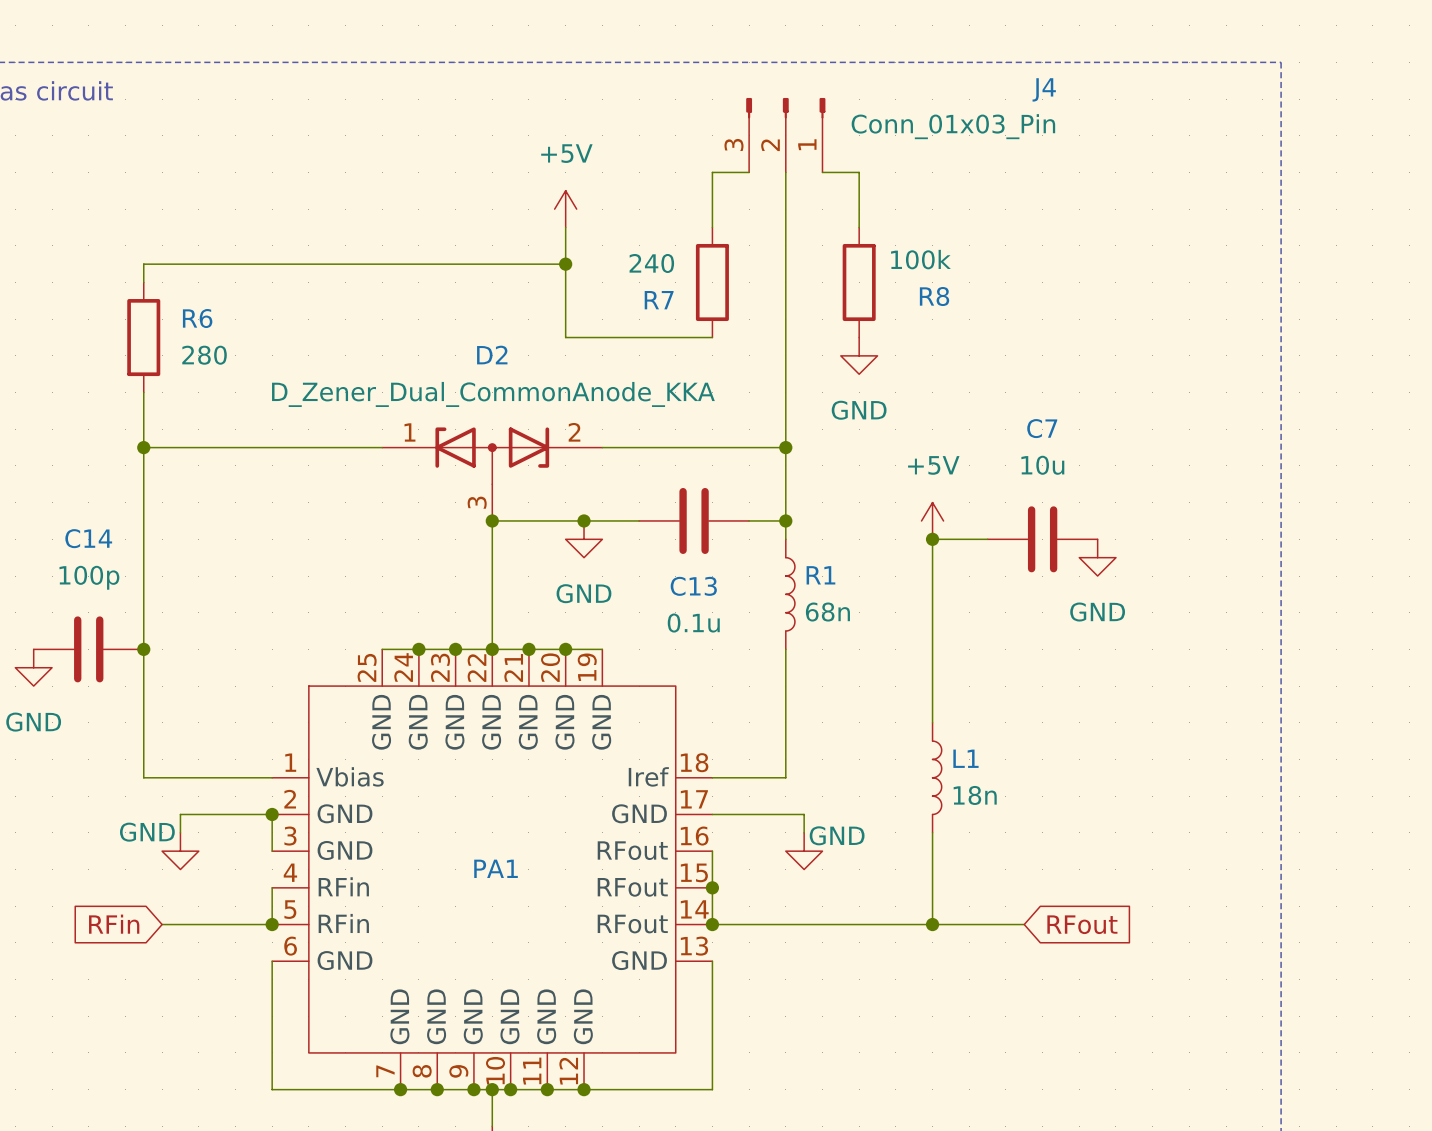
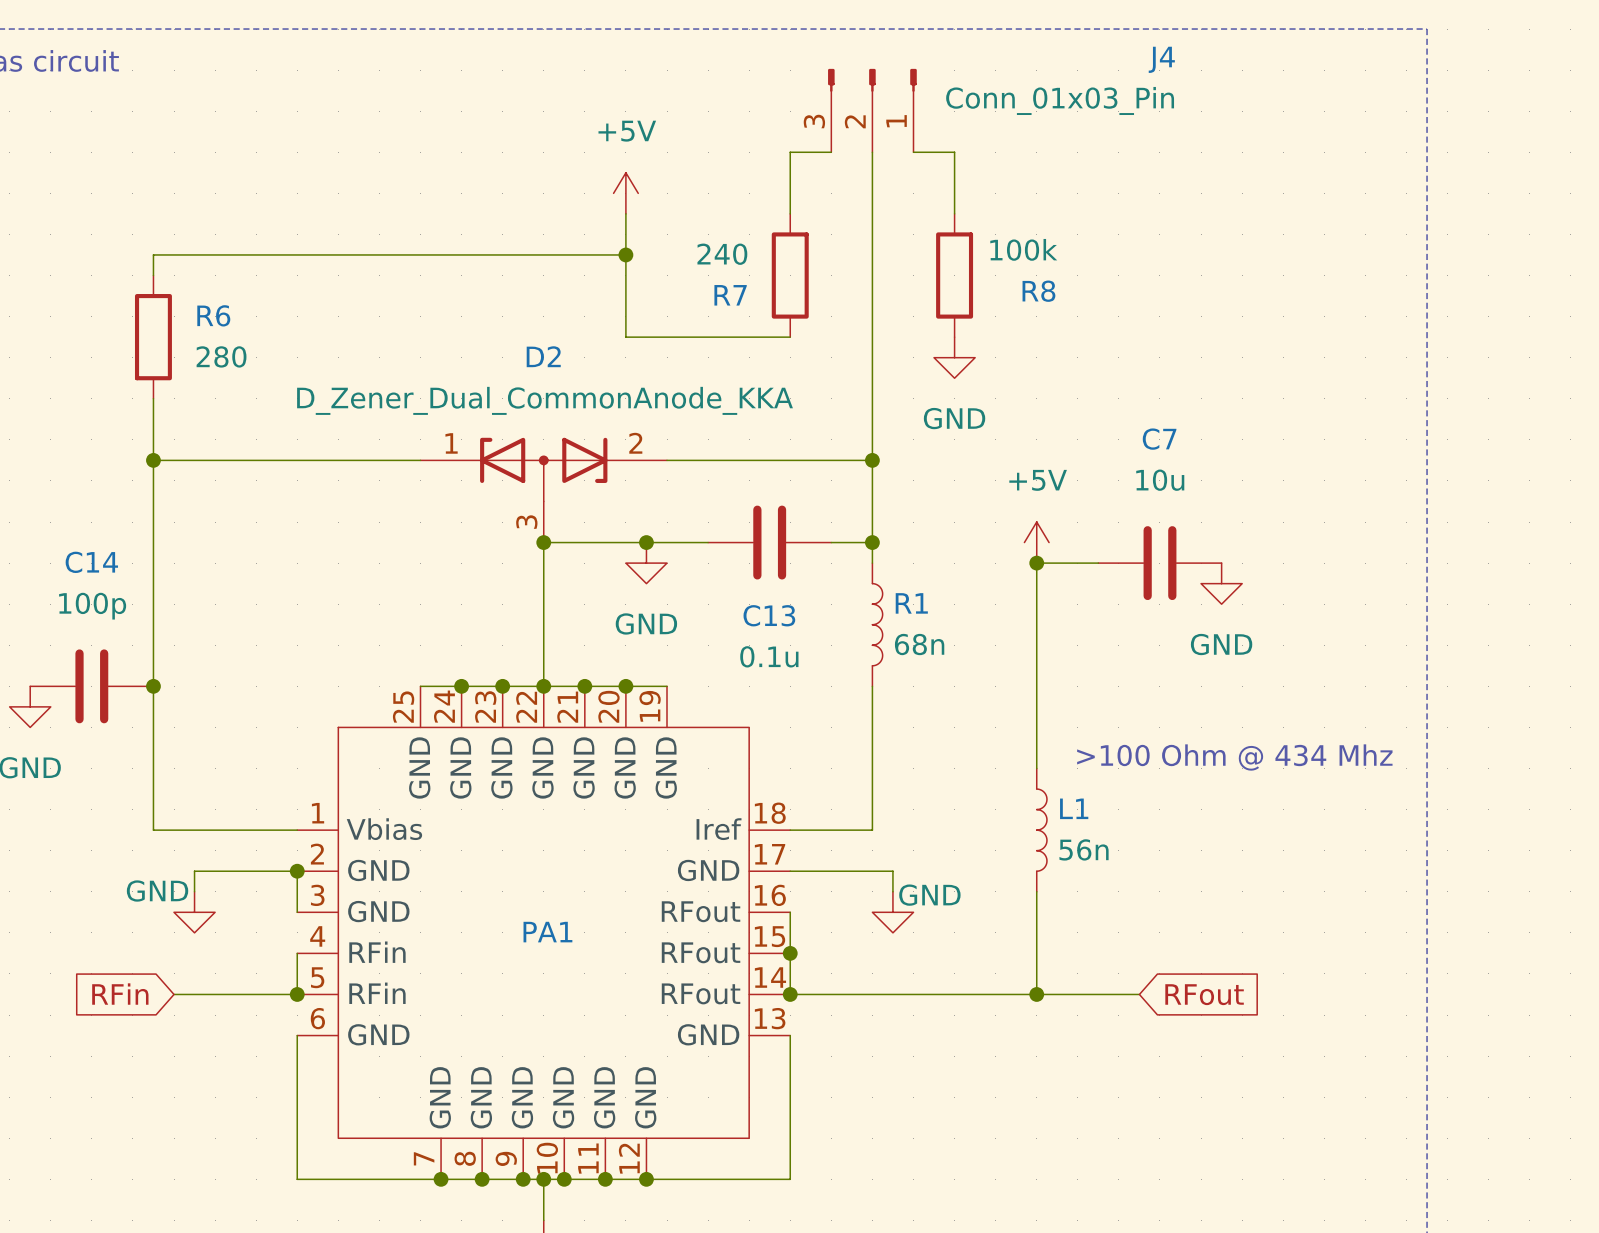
text: none -> >100 Ohm @ 434 Mhz (1234, 757)
L1 value: 18n (975, 795) -> 56n (1084, 849)

